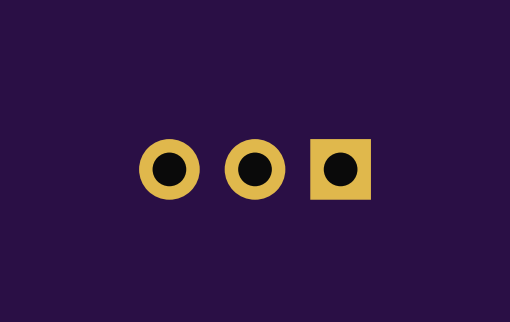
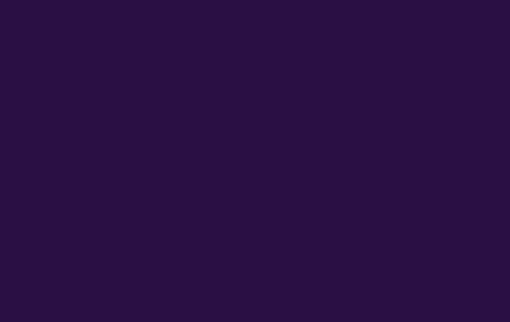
part: (255, 169) -> none

